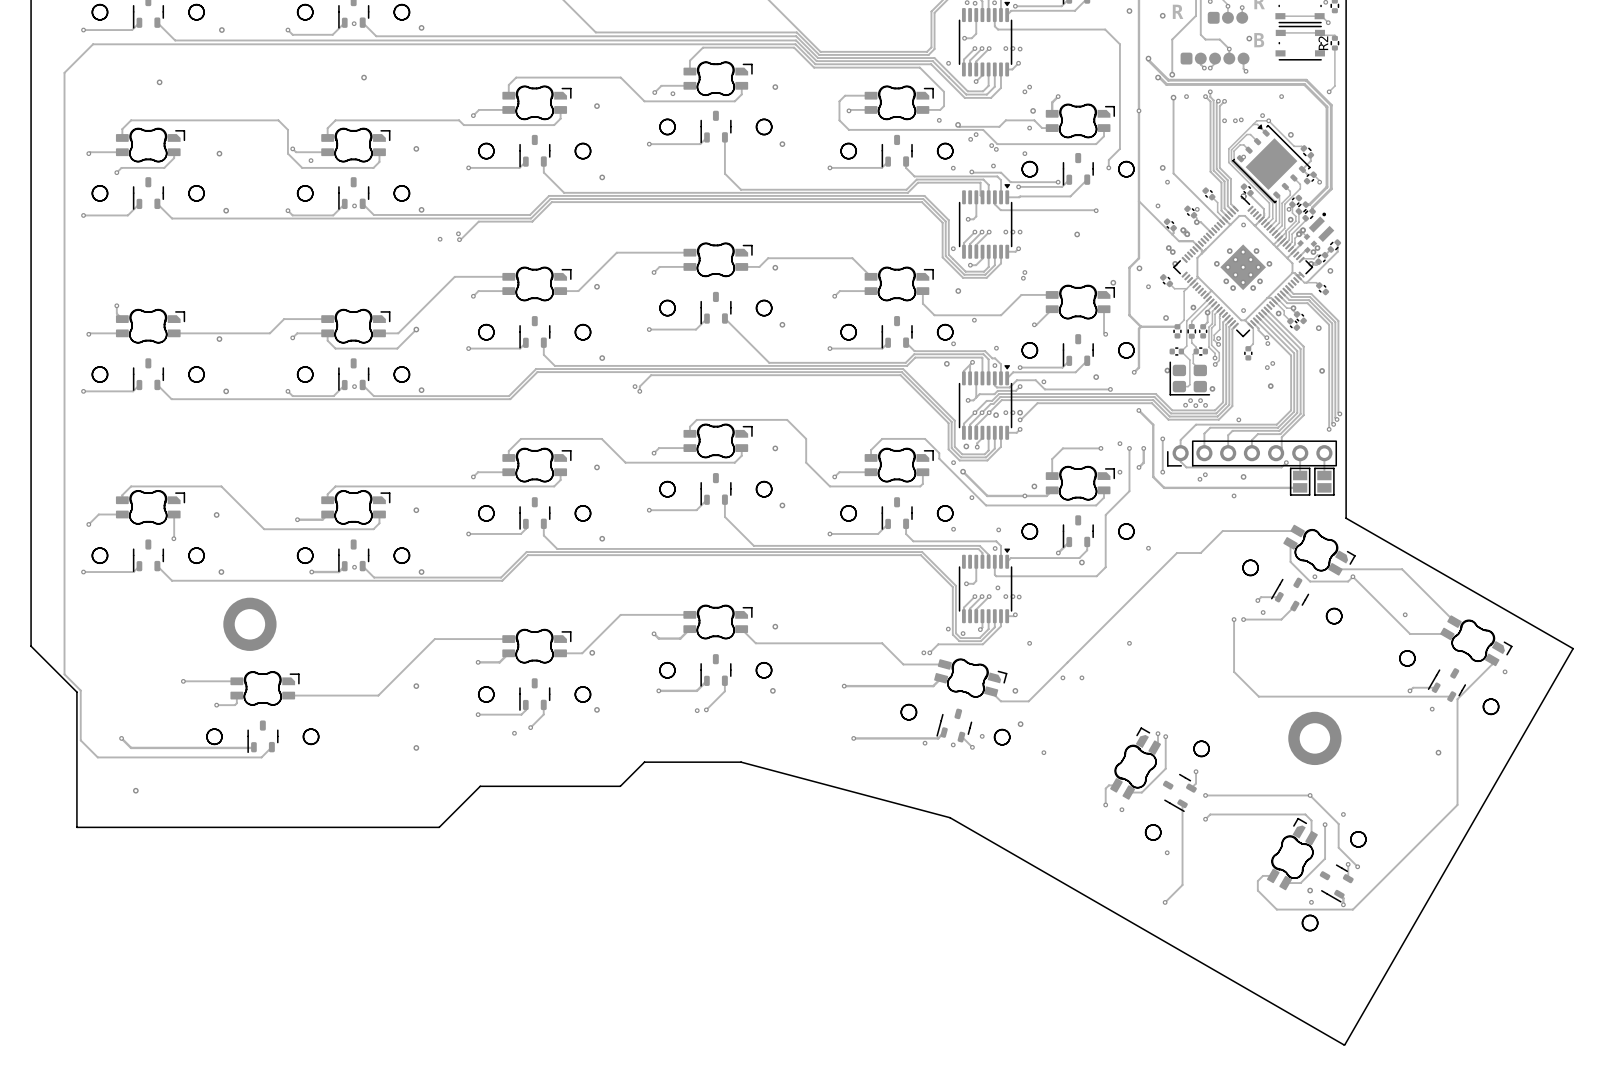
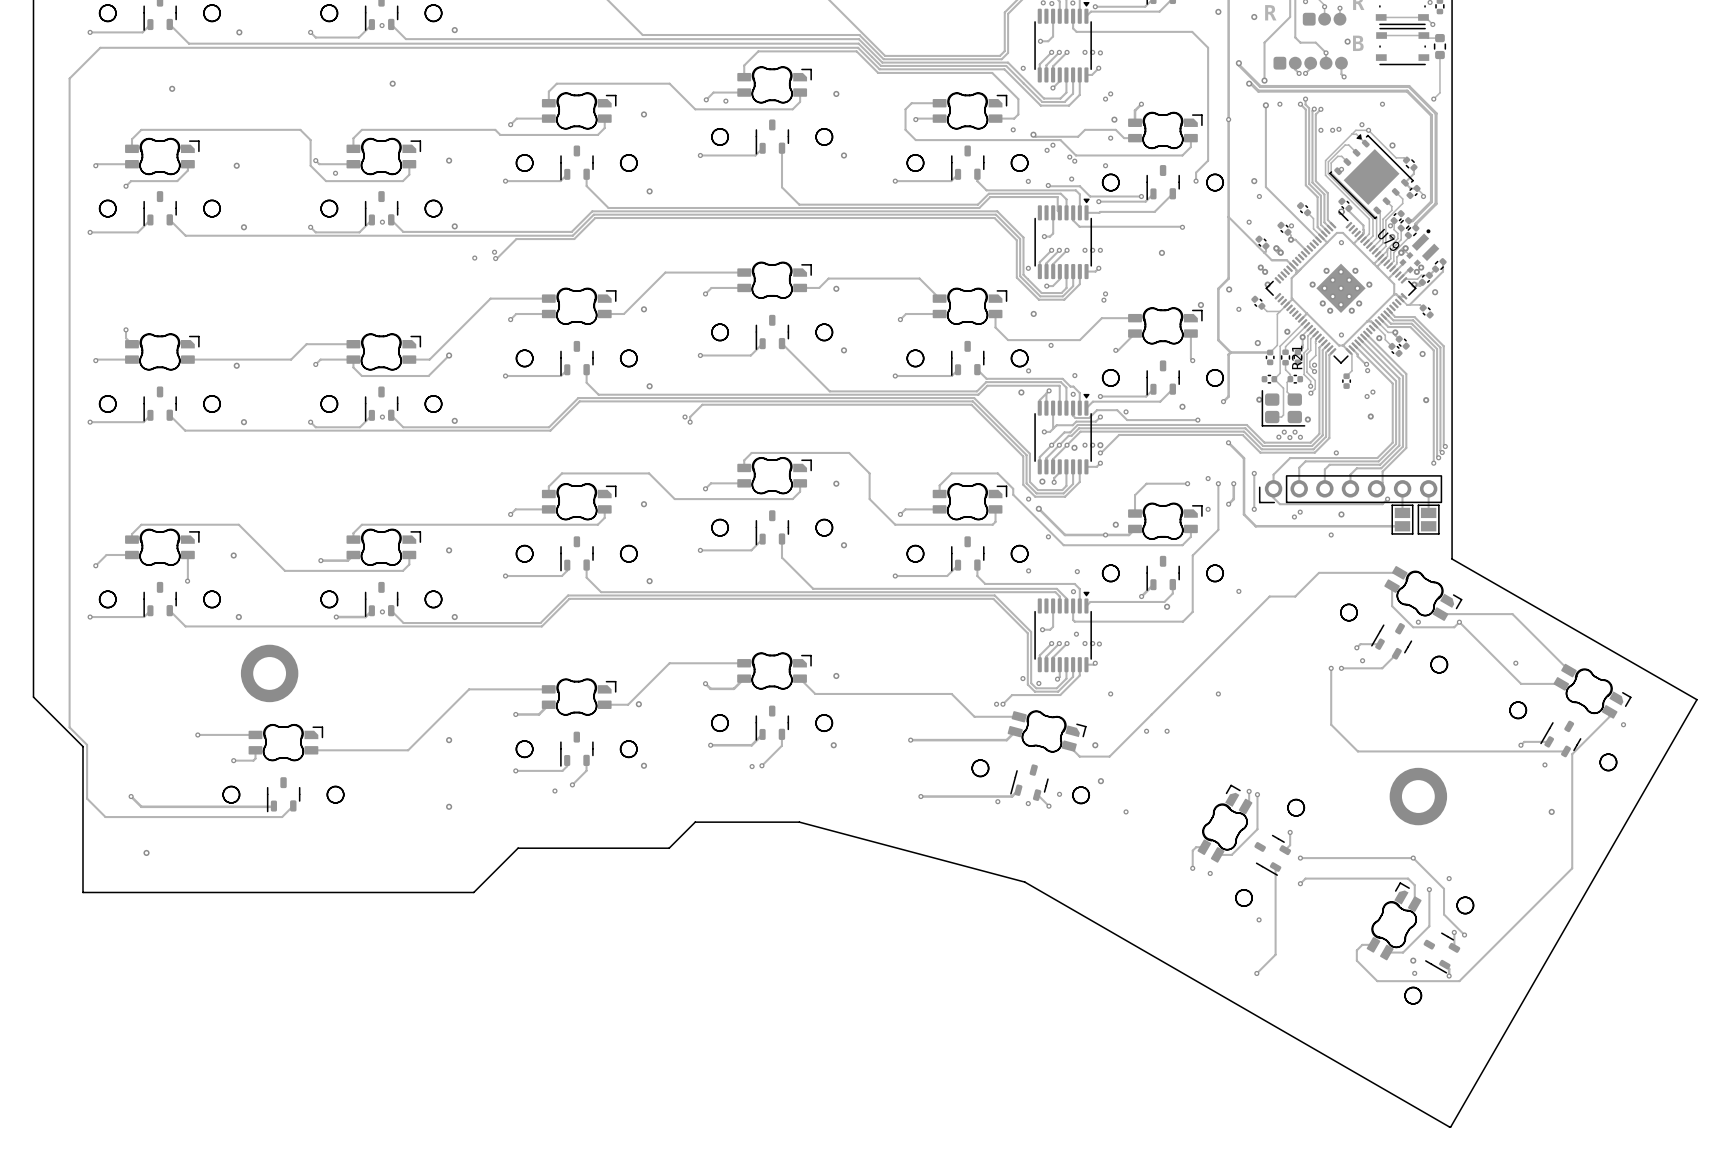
R2: (1334, 43) -> none
part: none -> (1439, 46)
U79 name: none -> U79 (1388, 239)
R21 name: none -> R21 (1297, 357)

